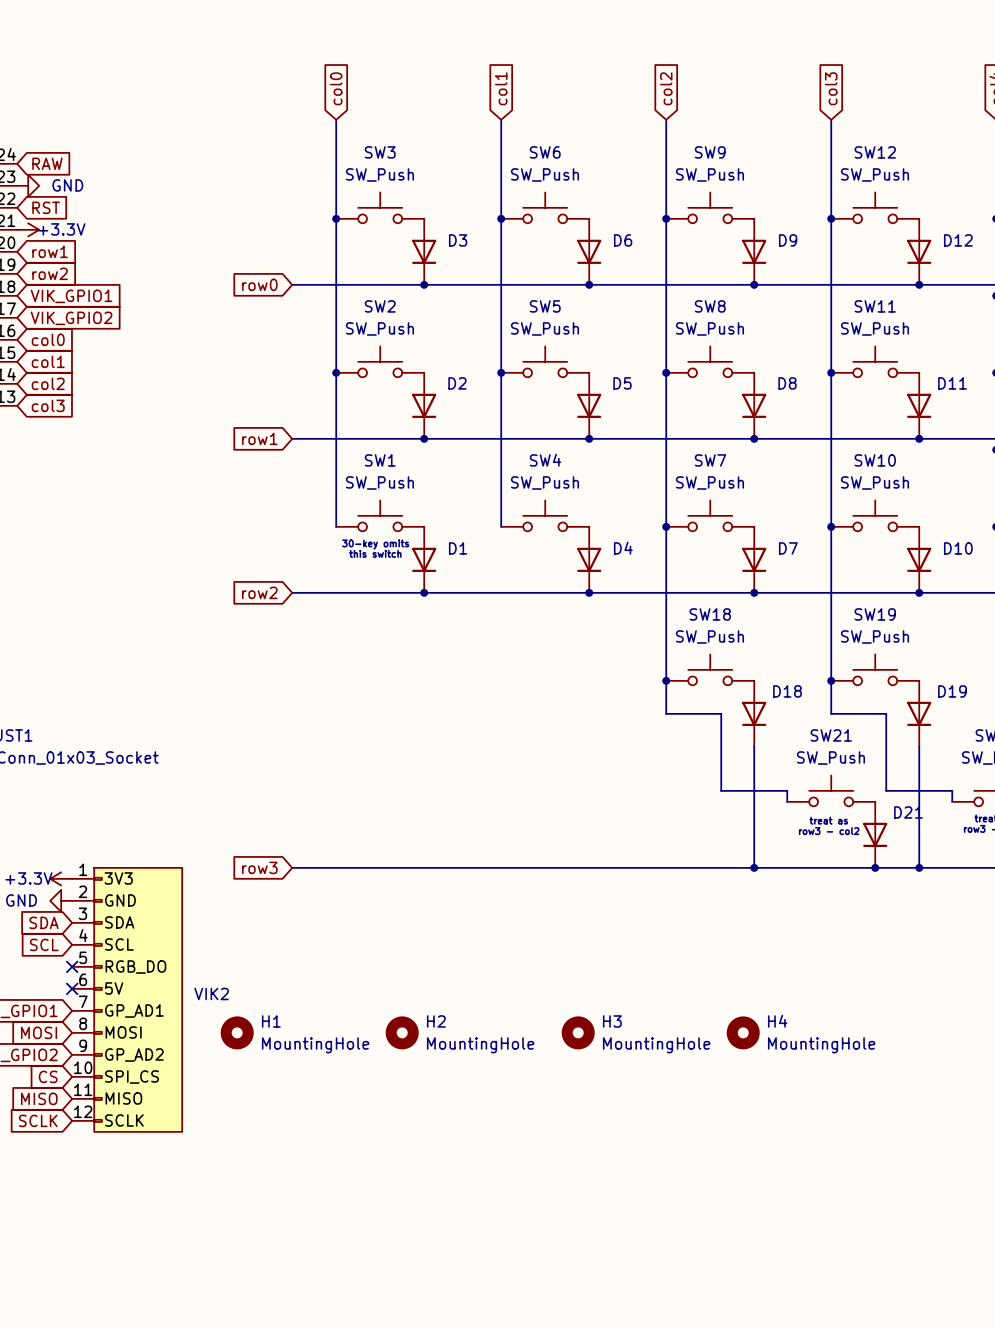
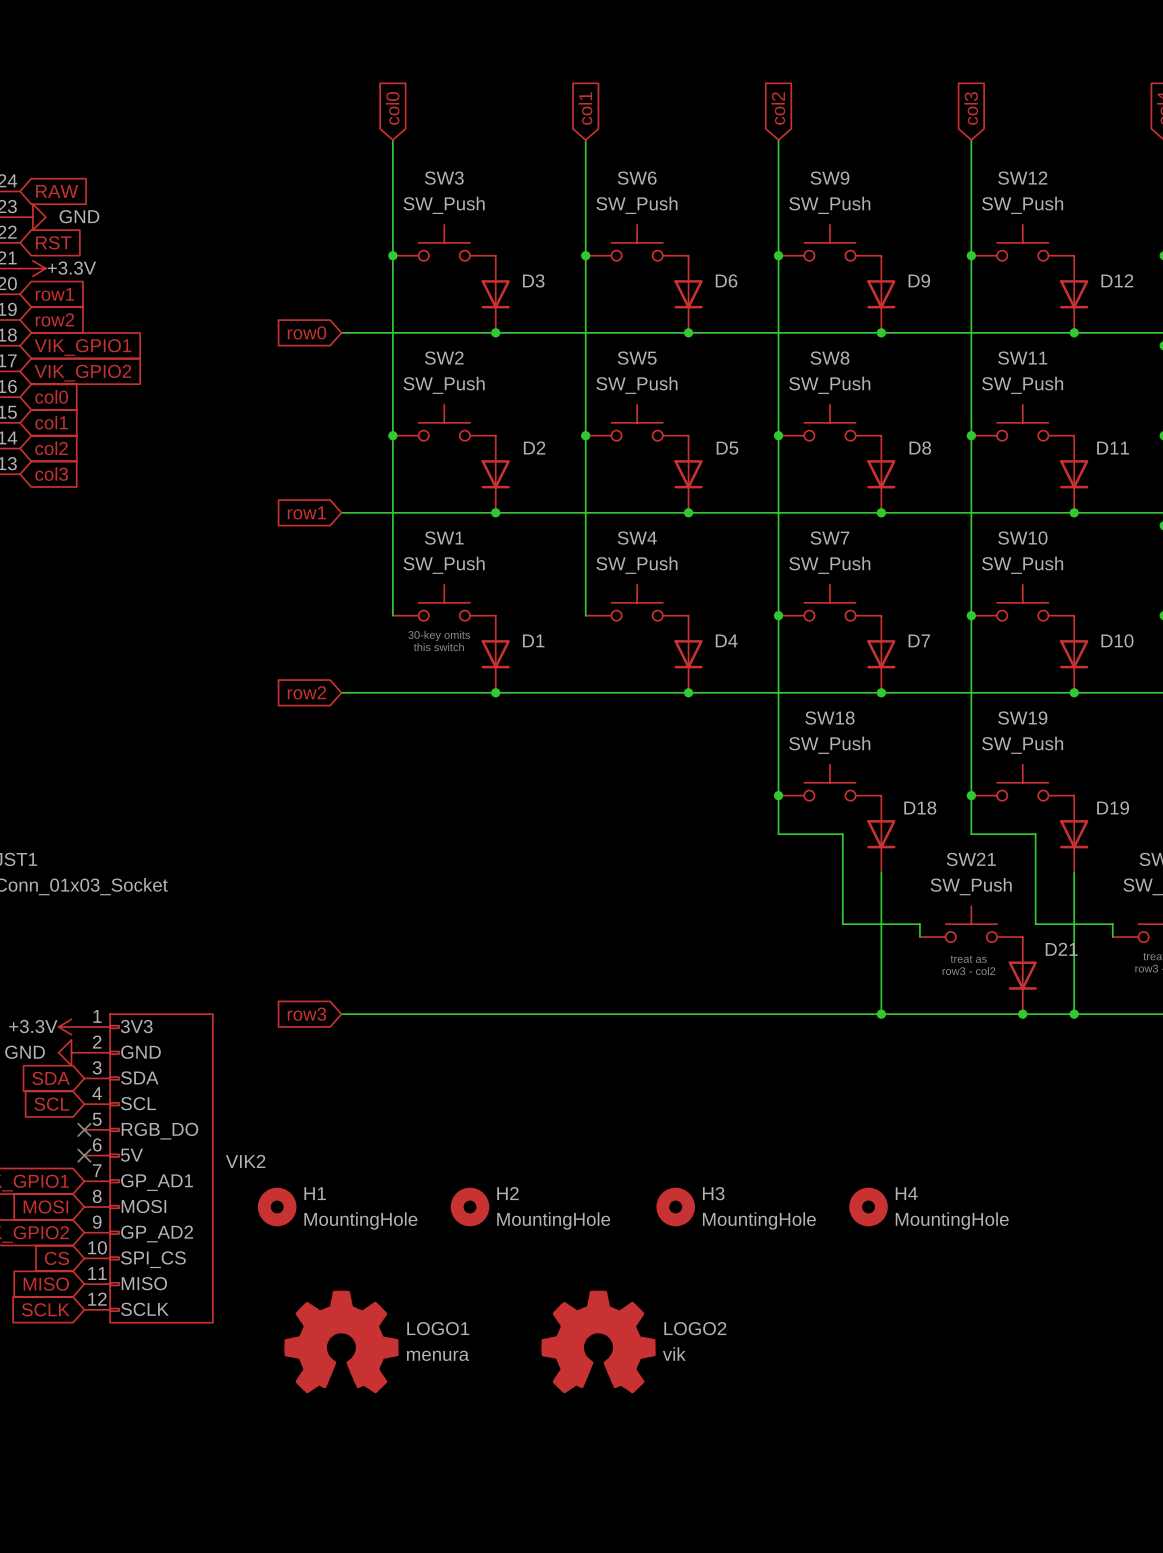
LOGO1: none -> menura (341, 1341)
LOGO2: none -> vik (598, 1341)

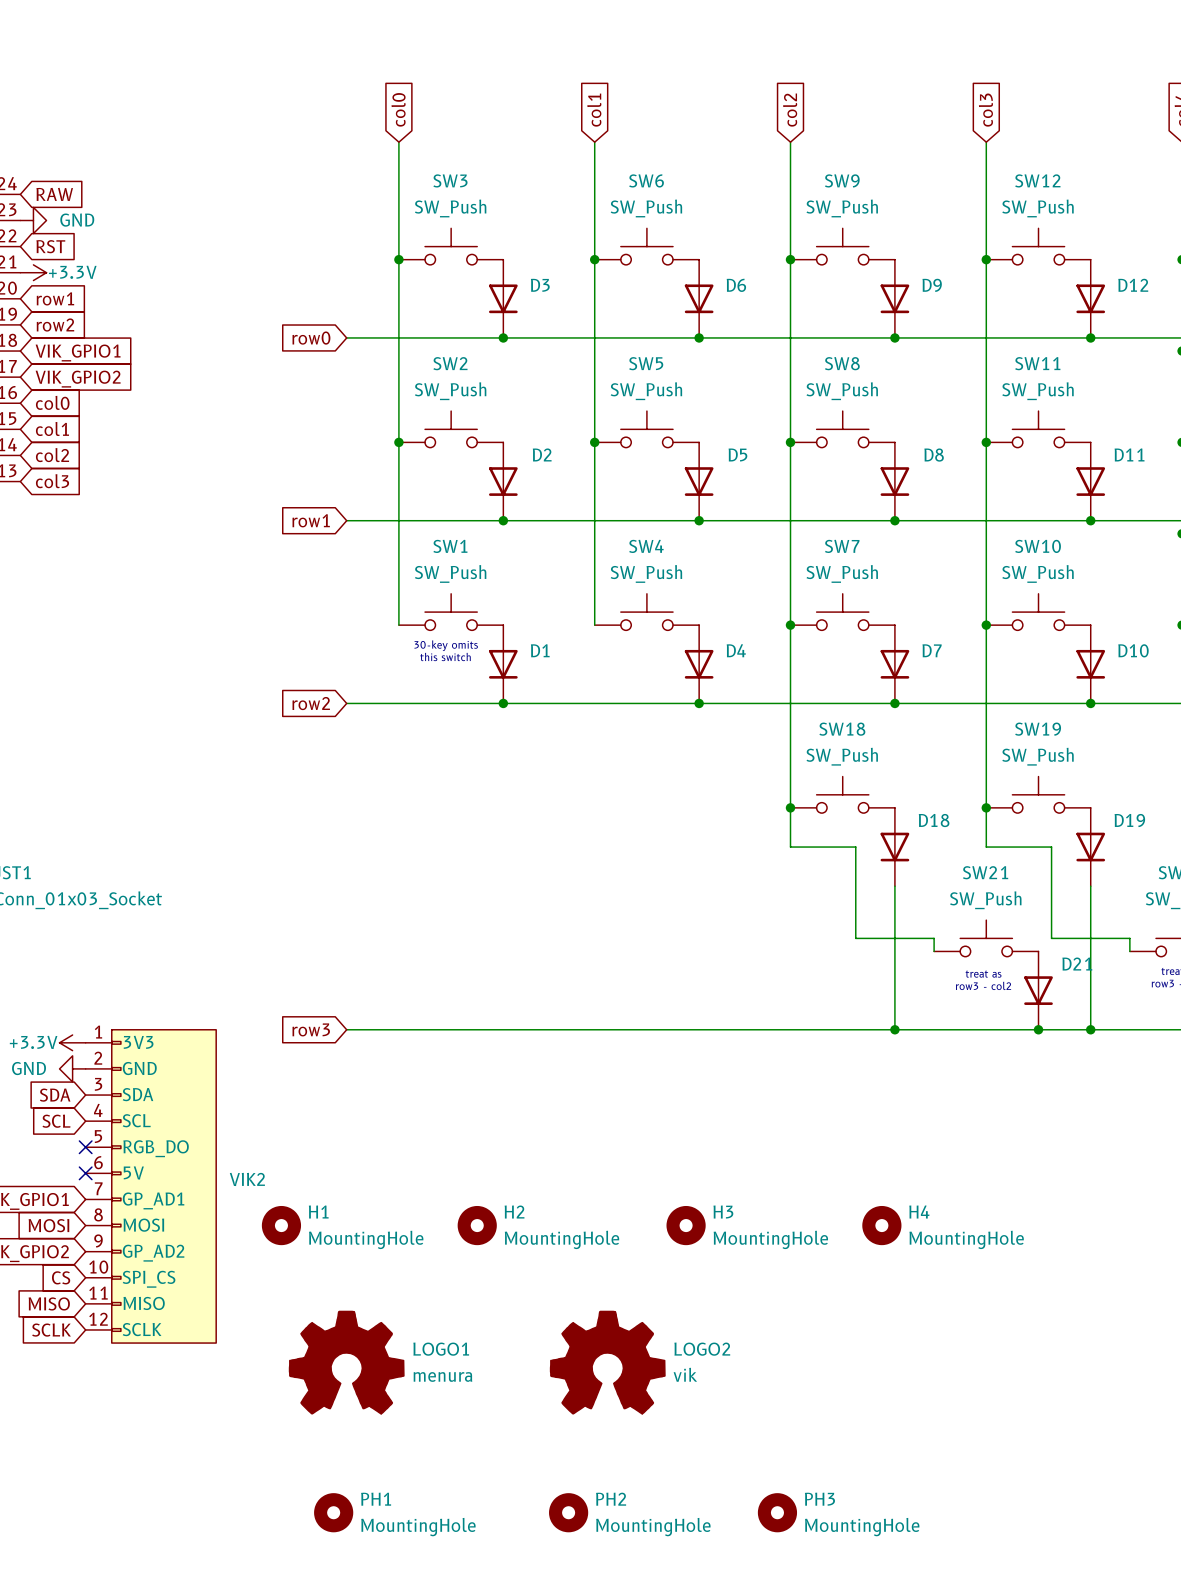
PH1: none -> MountingHole (333, 1512)
PH2: none -> MountingHole (568, 1512)
PH3: none -> MountingHole (777, 1512)

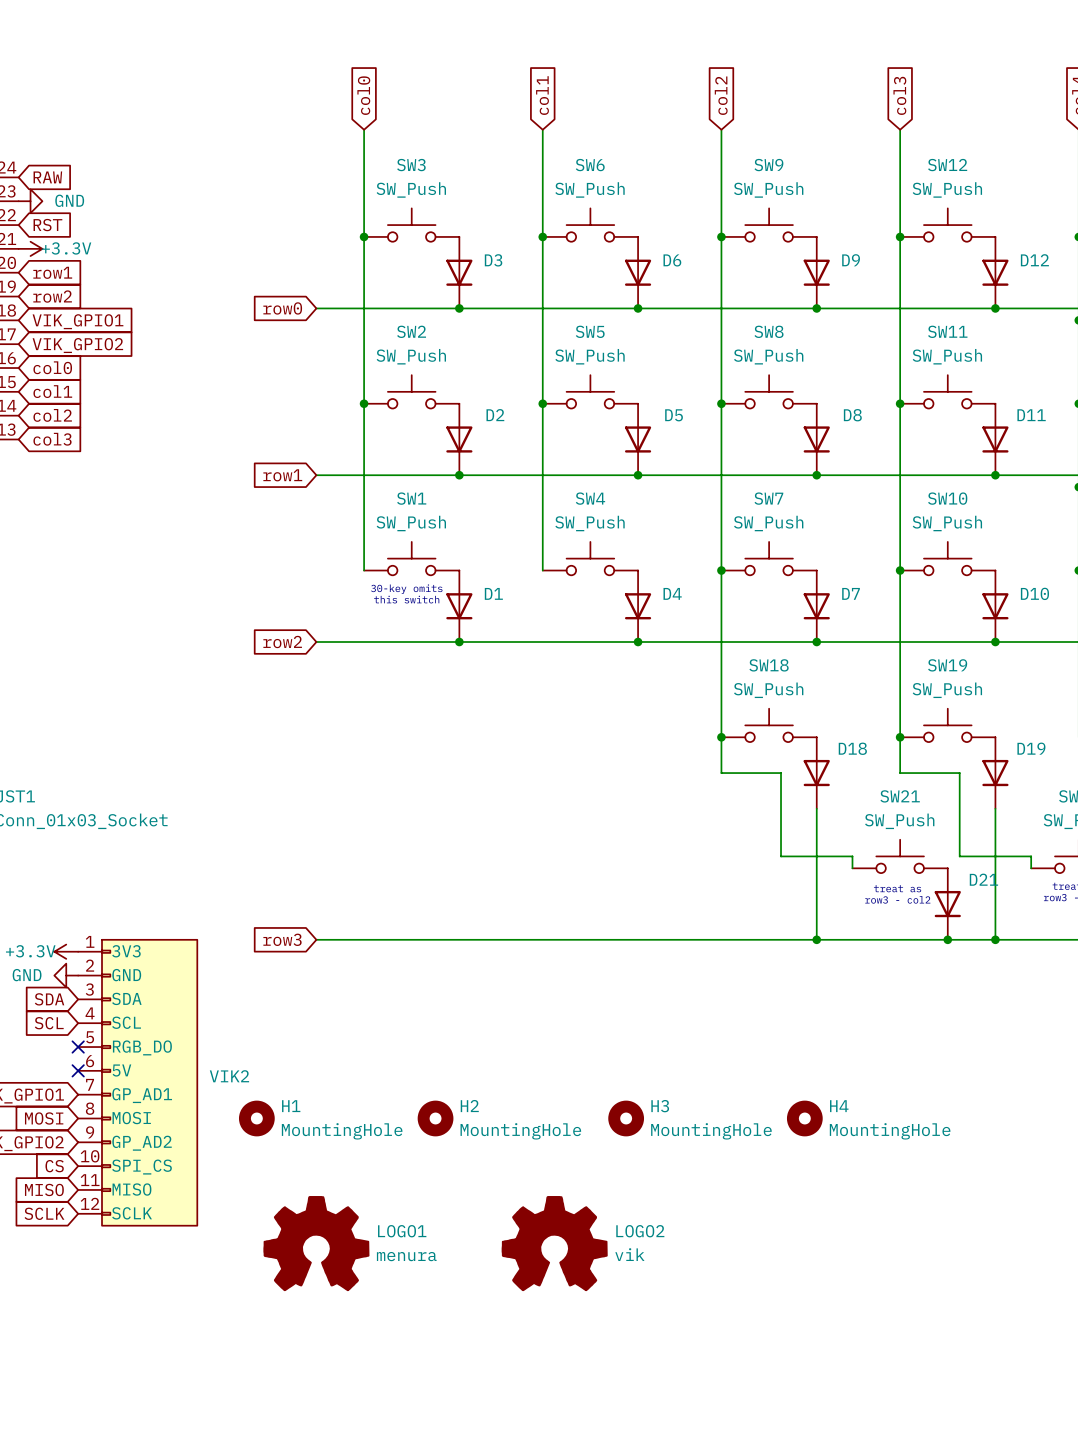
PH1: MountingHole (333, 1512) -> none
PH2: MountingHole (568, 1512) -> none
PH3: MountingHole (777, 1512) -> none

